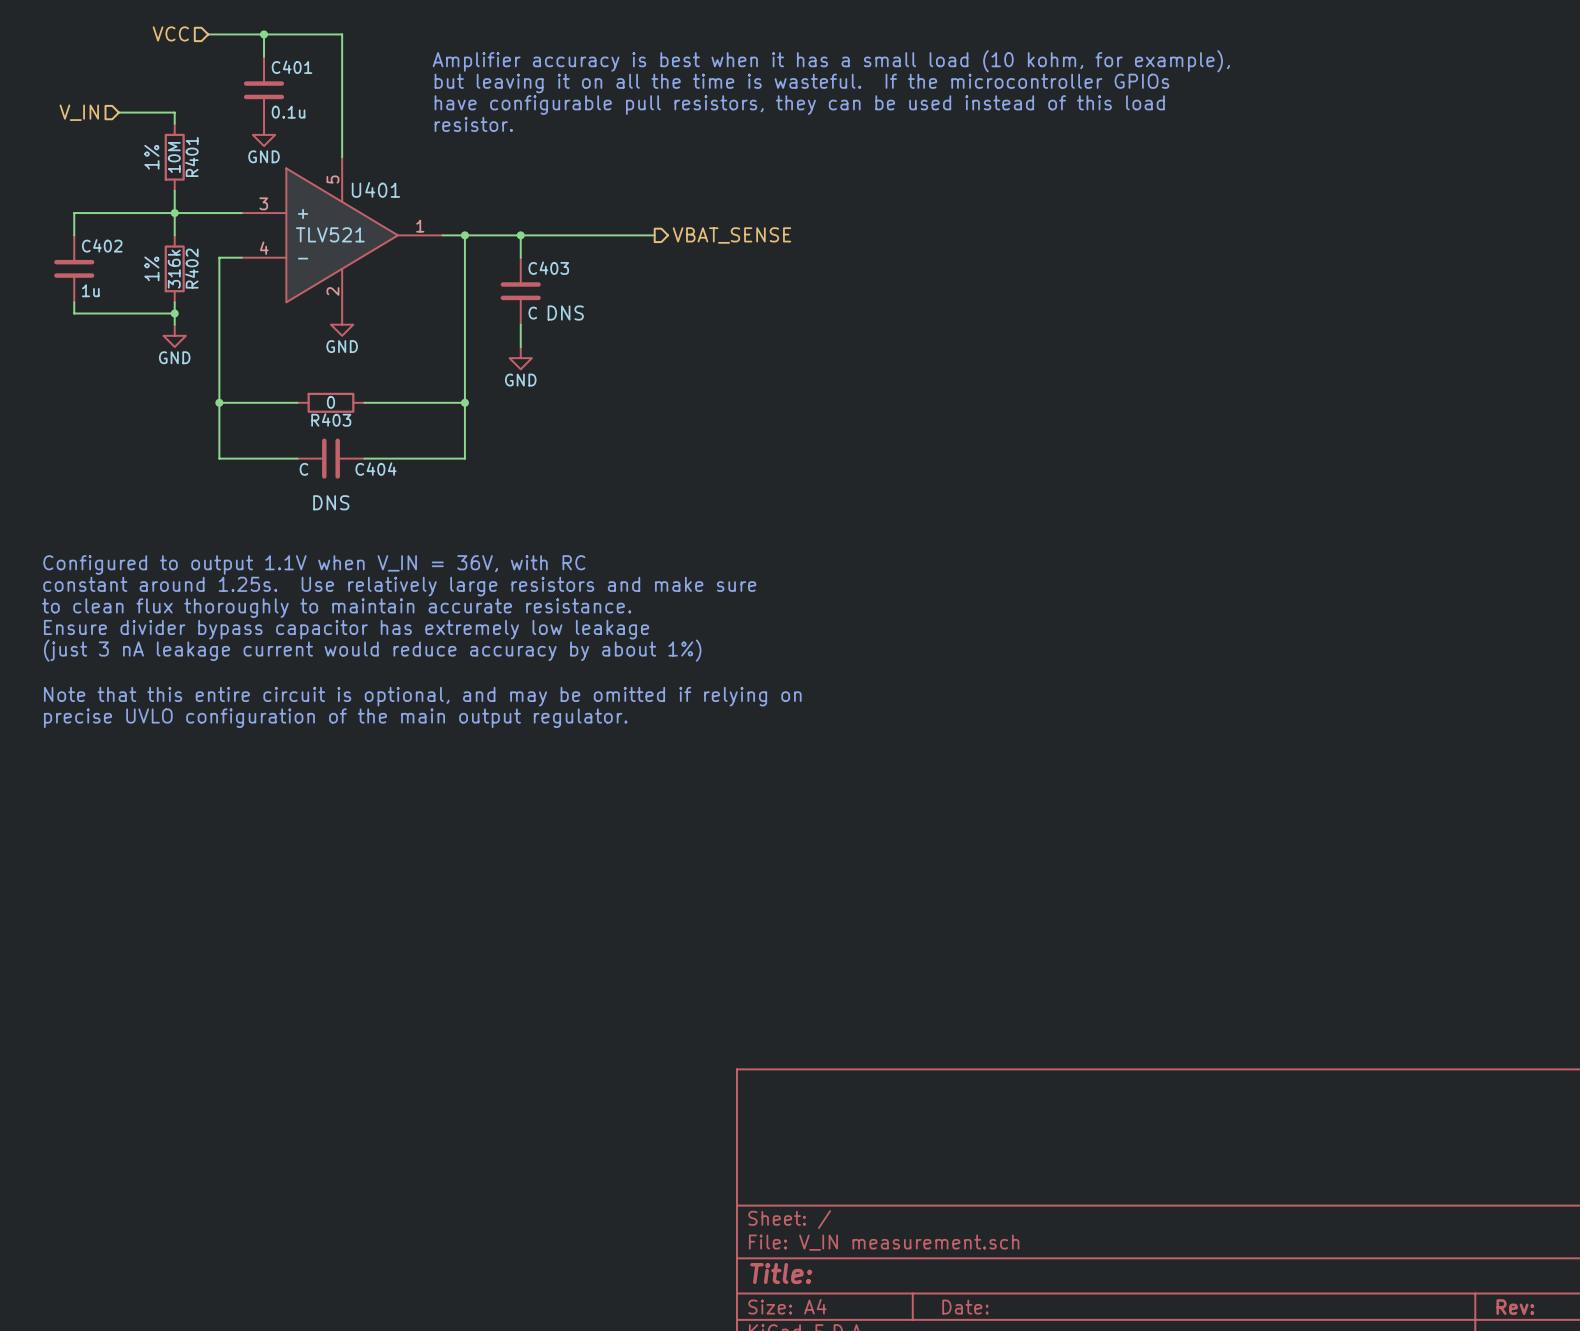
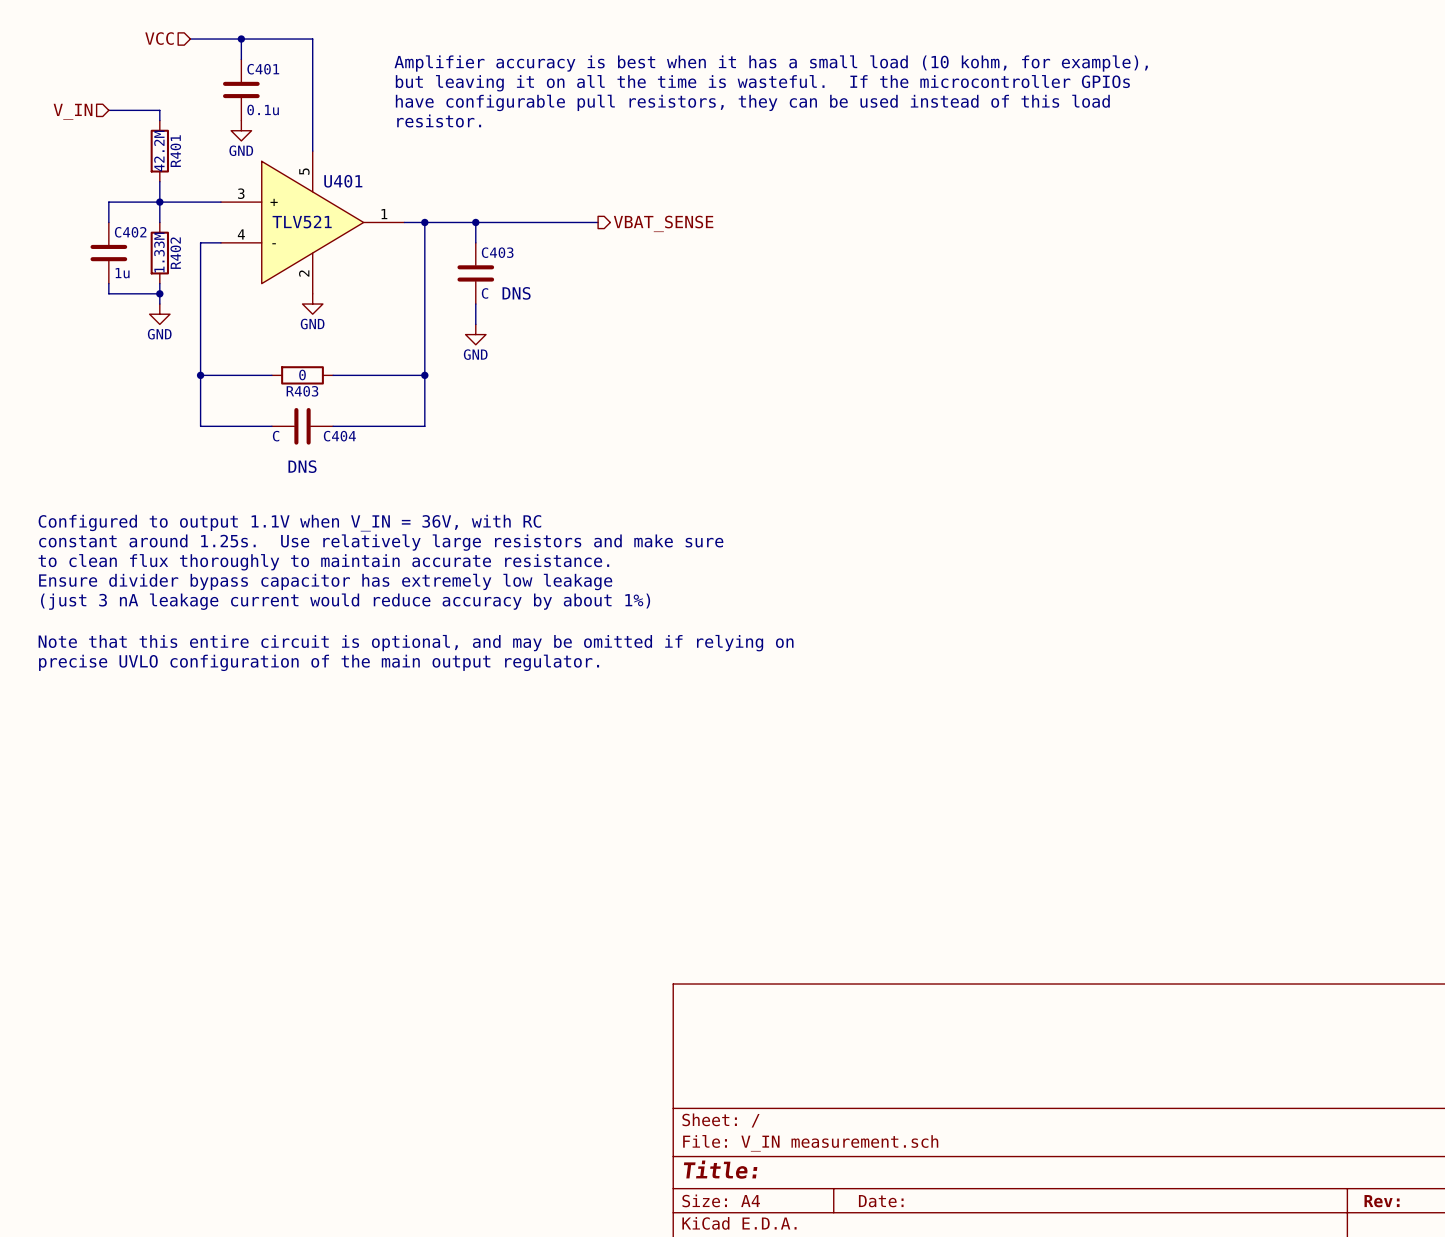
R401 text: 1% (151, 157) -> none
R401 value: 10M (174, 157) -> 42.2M (159, 151)
wire: (118, 213) (74, 213) (74, 235) -> (108, 202) (108, 222)
C402 position: (74, 268) -> (108, 253)
R402 text: 1% (151, 268) -> none
R402 value: 316k (174, 269) -> 1.33M (159, 252)
wire: (74, 302) (74, 313) (118, 313) -> (108, 283) (108, 293)

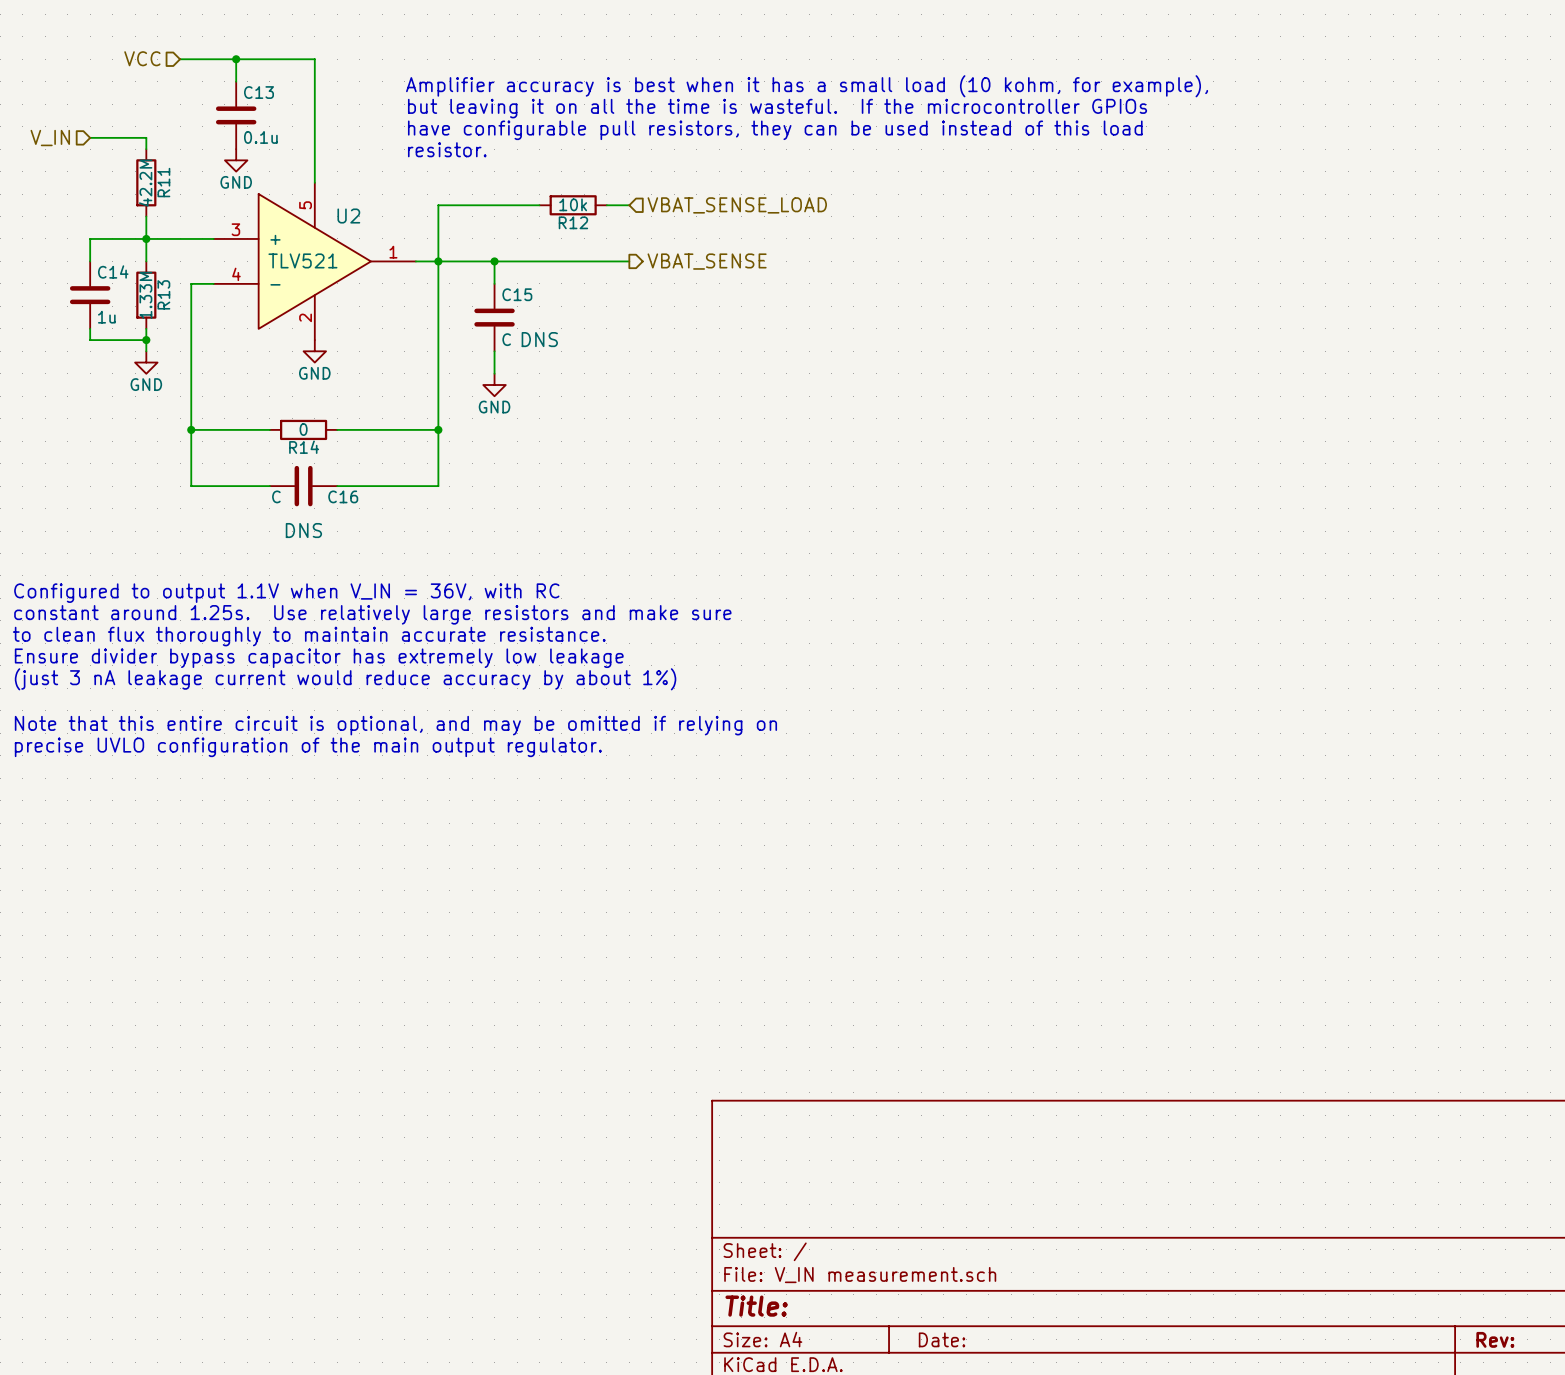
C401 name: C401 (263, 69) -> C13 (259, 92)
R401 name: R401 (175, 151) -> R11 (163, 182)
wire: none -> (539, 205) (438, 205) (438, 261)
R12: none -> 10k (573, 205)
wire: none -> (606, 205) (629, 205)
hierarchical label: none -> VBAT_SENSE_LOAD (737, 205)
U401 name: U401 (343, 181) -> U2 (348, 216)
C402 name: C402 (130, 232) -> C14 (113, 271)
C403 name: C403 (497, 252) -> C15 (517, 294)
R402 name: R402 (175, 253) -> R13 (163, 294)
R403 name: R403 (302, 391) -> R14 (304, 447)
C404 name: C404 (339, 436) -> C16 (343, 496)

